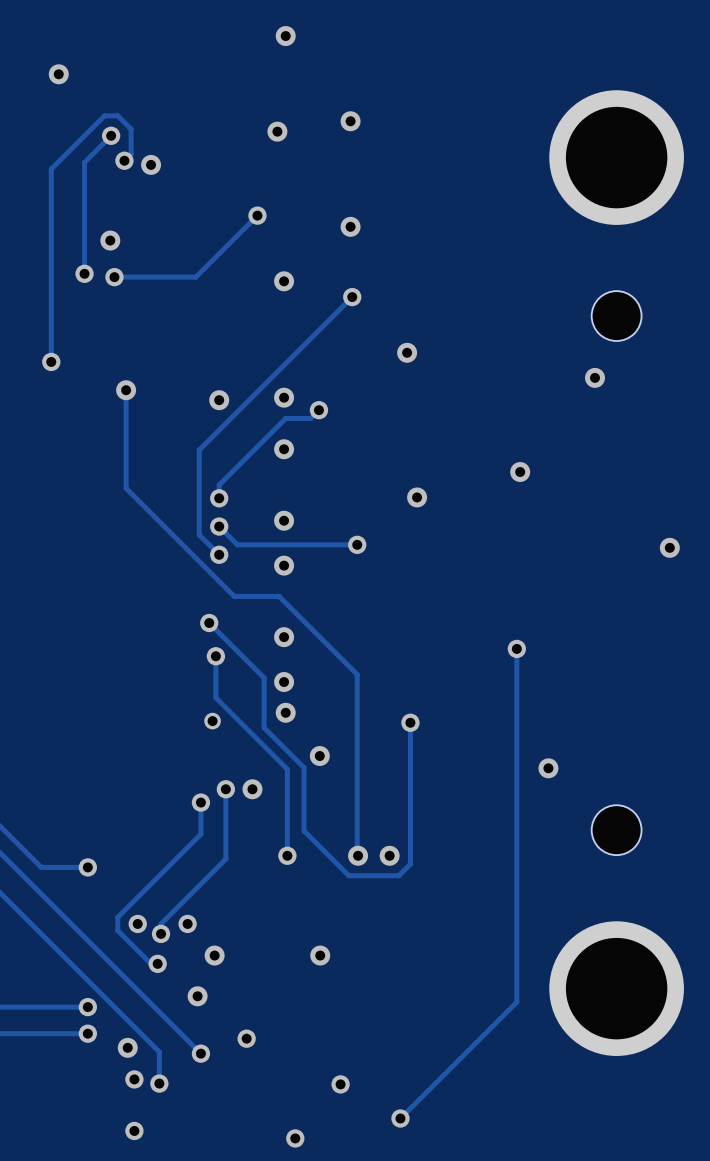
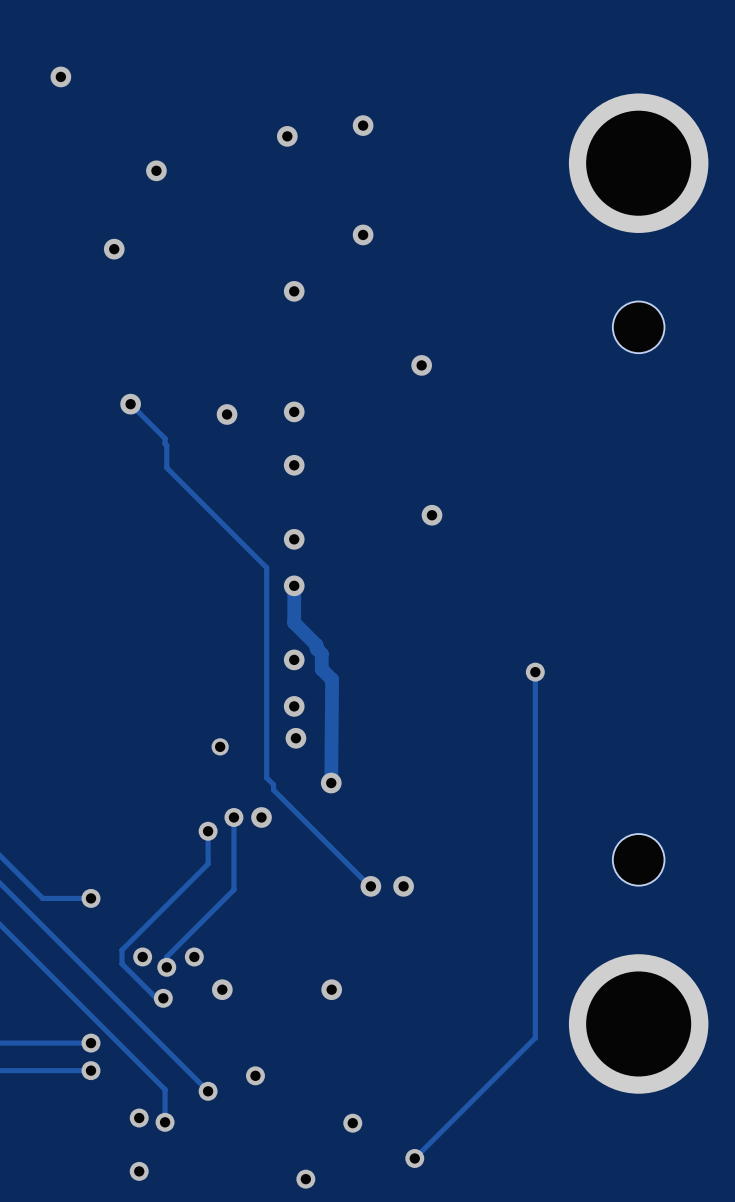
via: (285, 36) -> none
track: (111, 135) (84, 162) (84, 273) -> none
via: (111, 135) -> none
track: (124, 160) (131, 154) (131, 129) (117, 115) (104, 115) (51, 169) (51, 361) -> none
via: (124, 160) -> none
track: (257, 215) (195, 277) (114, 277) -> none
via: (257, 215) -> none
via: (84, 273) -> none
via: (114, 277) -> none
track: (352, 297) (199, 450) (199, 534) (219, 554) -> none
via: (352, 297) -> none
via: (51, 361) -> none
via: (595, 377) -> none
track: (126, 390) (126, 488) (234, 596) (279, 596) (284, 601) -> (294, 584) (294, 622)
track: none -> (130, 404) (165, 438) (166, 467) (266, 567) (266, 777) (273, 784) (273, 789) (370, 886)
track: (318, 410) (310, 418) (285, 418) (219, 484) (219, 498) -> none
via: (318, 410) -> none
via: (520, 472) -> none
via: (219, 498) -> none
track: (219, 526) (237, 544) (357, 544) -> none
via: (219, 526) -> none
via: (357, 544) -> none
via: (669, 547) -> none
via: (219, 554) -> none
track width: thin (284, 601) (305, 622) -> thick (294, 622) (316, 645)
track: (209, 622) (264, 677) (264, 727) (304, 767) (304, 830) (348, 875) (398, 875) (410, 864) (410, 722) -> none
via: (209, 622) -> none
track: (305, 622) (357, 674) (357, 855) -> (316, 645) (316, 648) (321, 653) (321, 669) (332, 679) (331, 783)
track: (215, 656) (215, 697) (287, 769) (287, 855) -> none
via: (215, 656) -> none
via: (410, 722) -> none
via: (548, 768) -> none
via: (287, 855) -> none
via: (197, 996) -> none
via: (127, 1047) -> none

